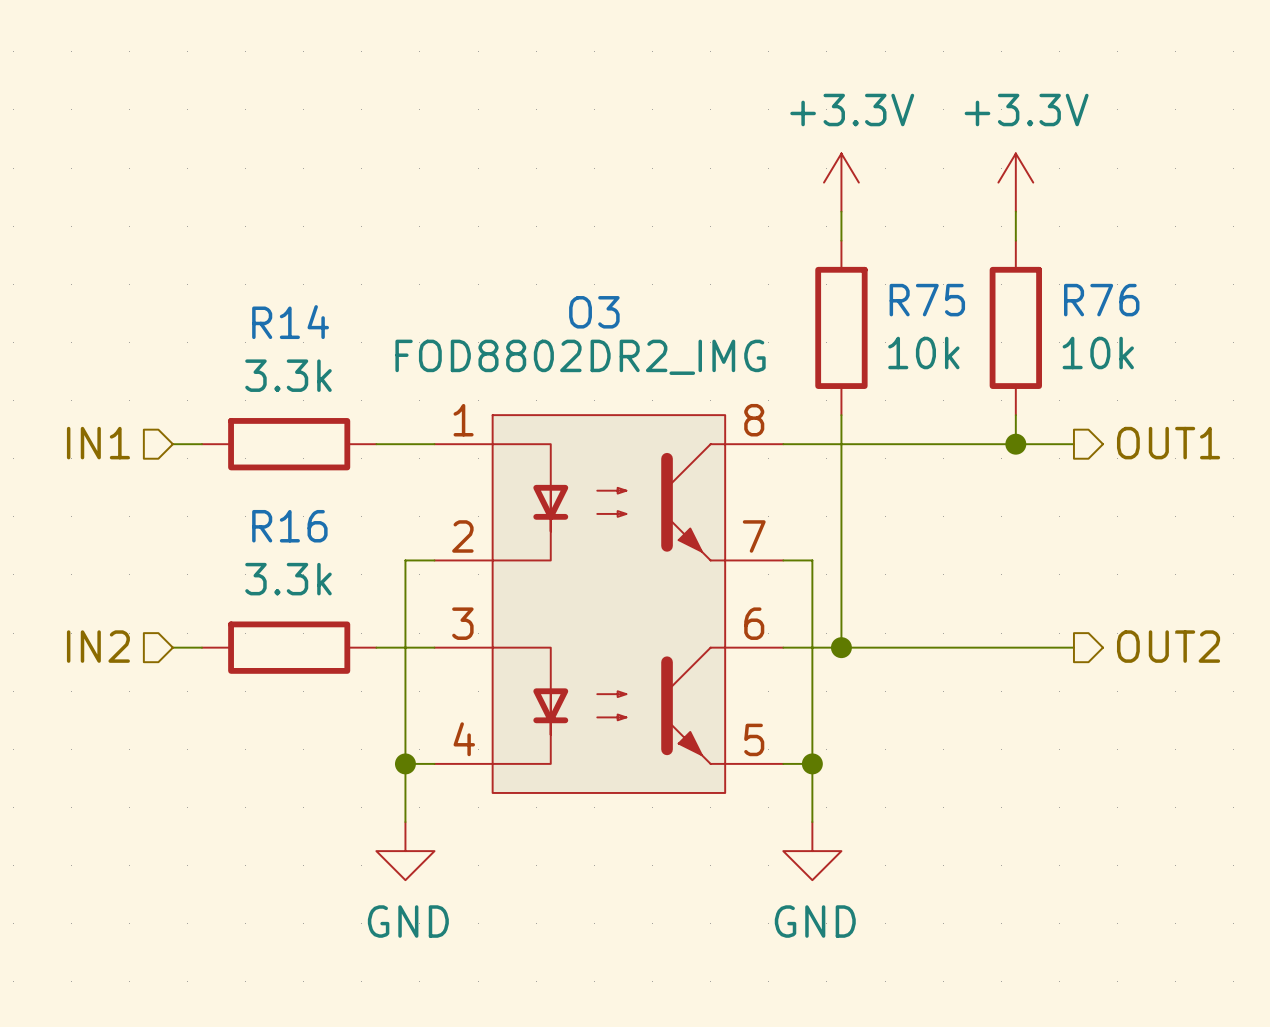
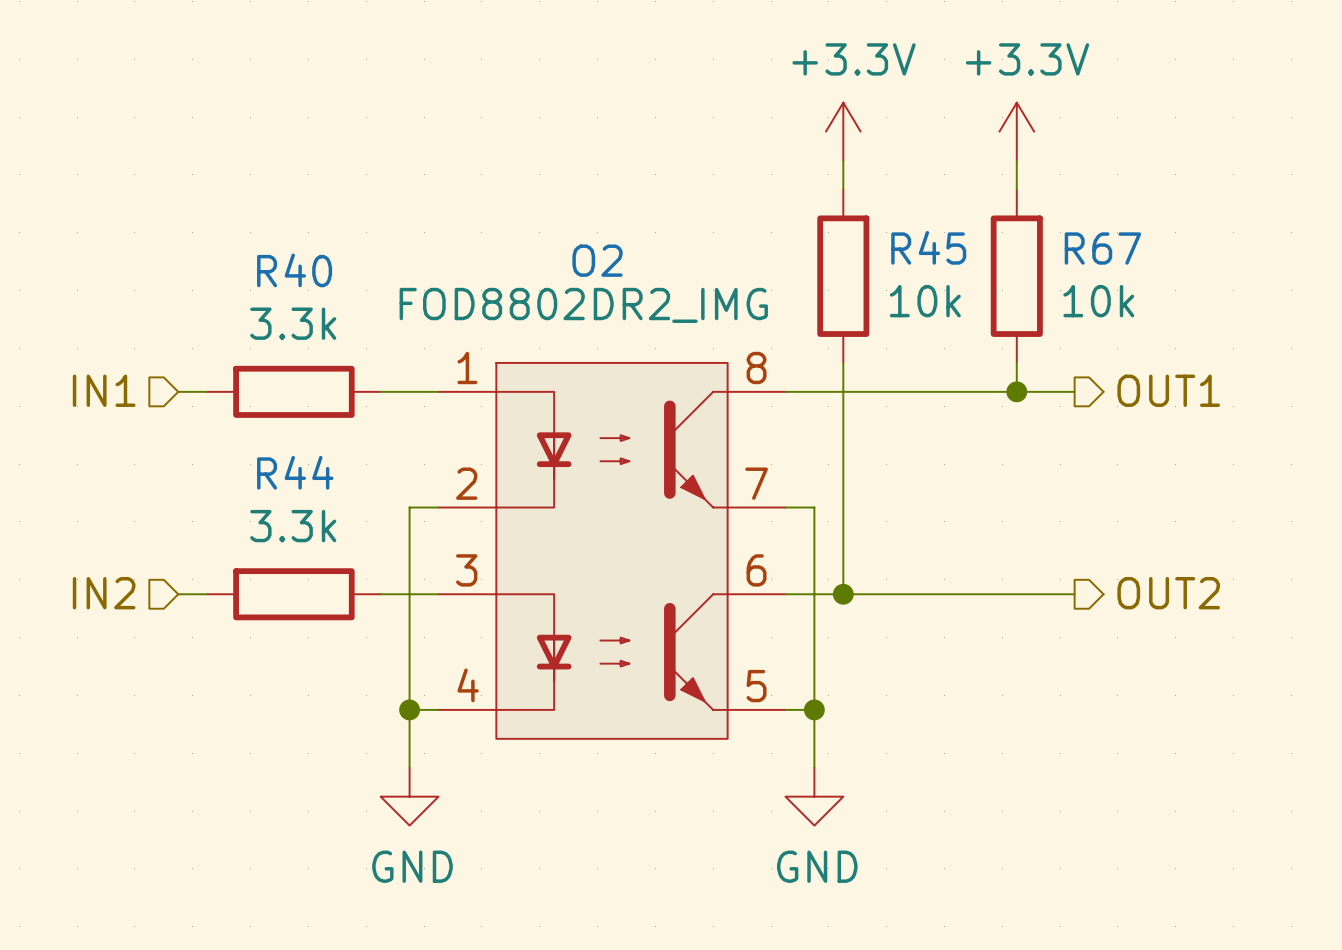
R75 name: R75 (927, 300) -> R45 (928, 247)
R76 name: R76 (1101, 300) -> R67 (1102, 248)
O3 name: O3 (594, 312) -> O2 (597, 260)
R14 name: R14 (290, 322) -> R40 (294, 270)
R16 name: R16 (289, 526) -> R44 (295, 472)

